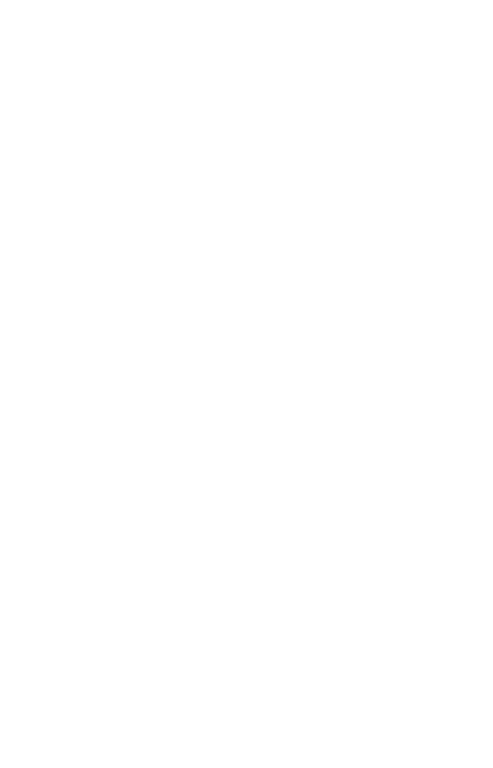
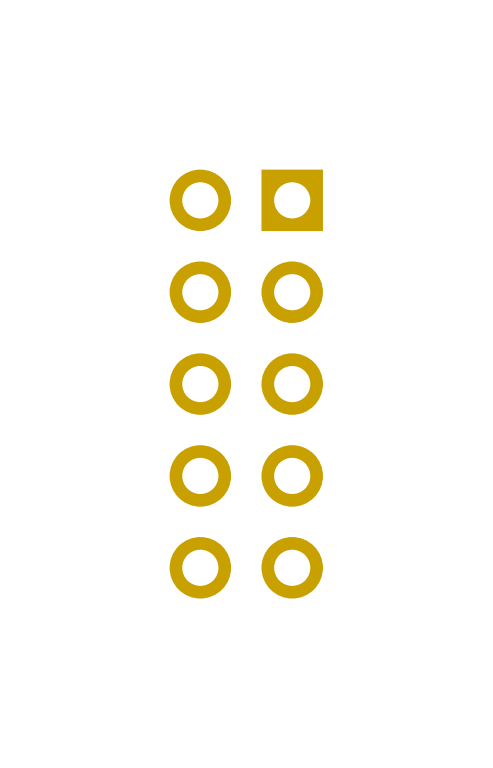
part: none -> (246, 384)

